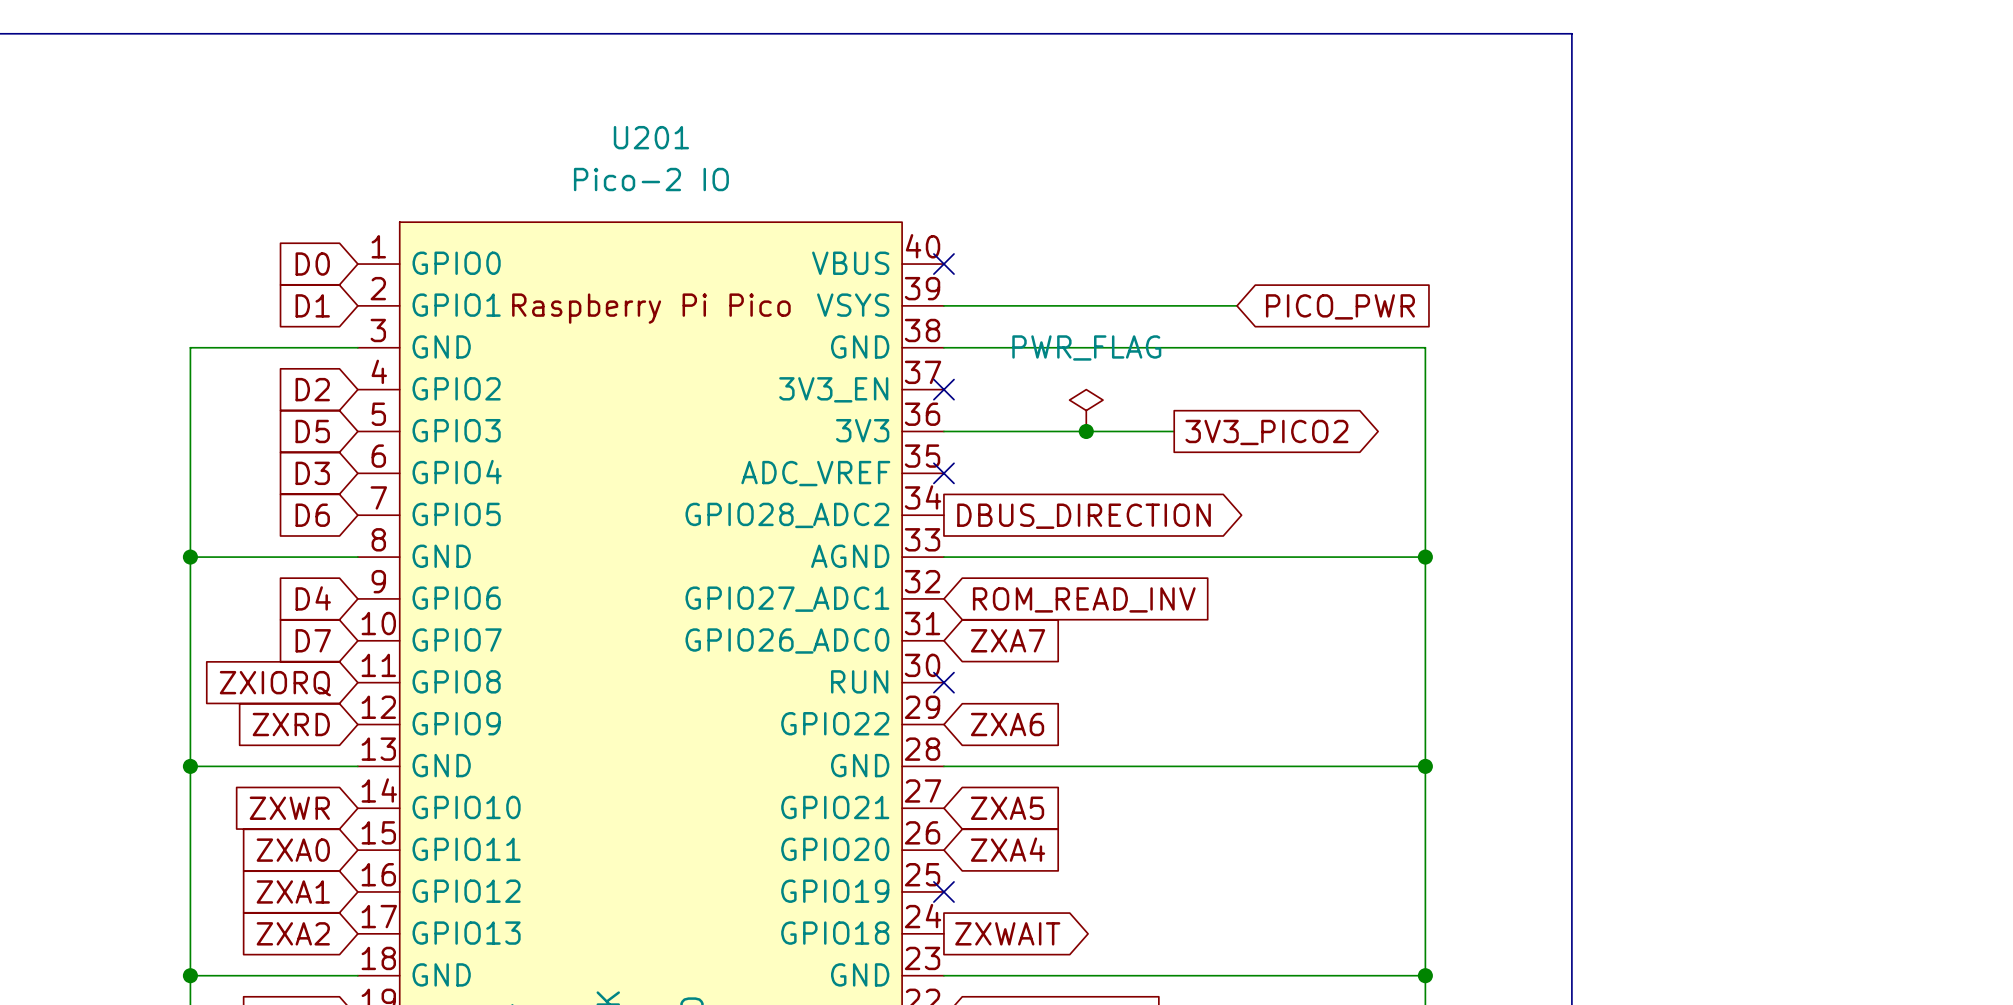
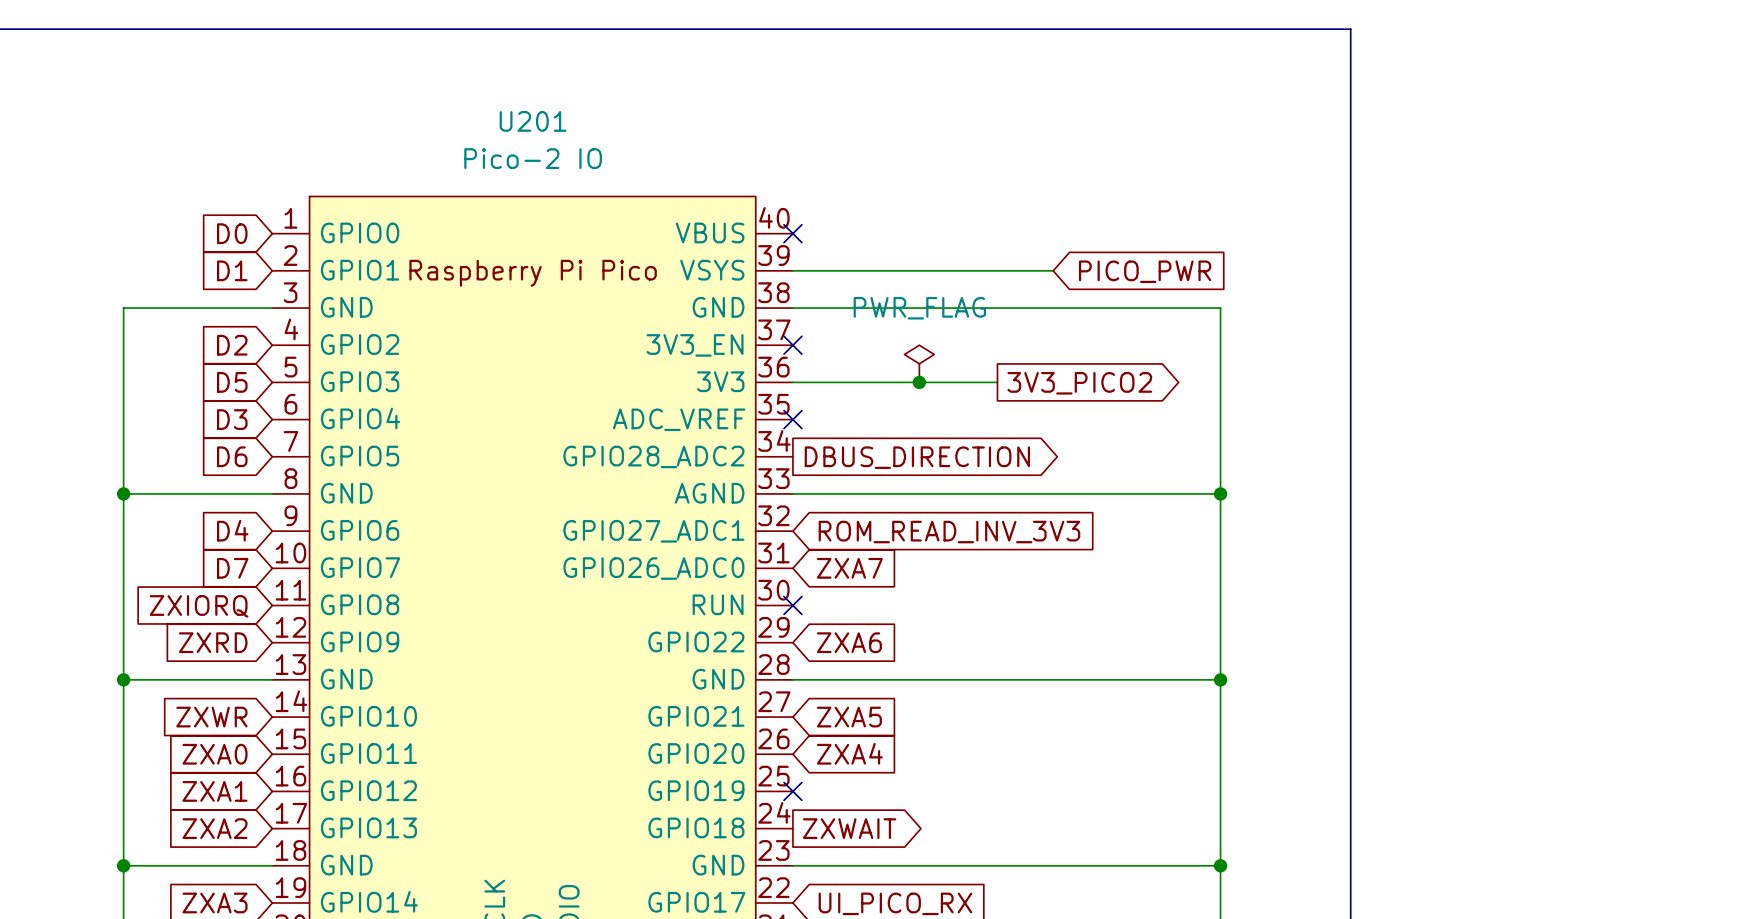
global label: ROM_READ_INV (1084, 599) -> ROM_READ_INV_3V3 (949, 532)

